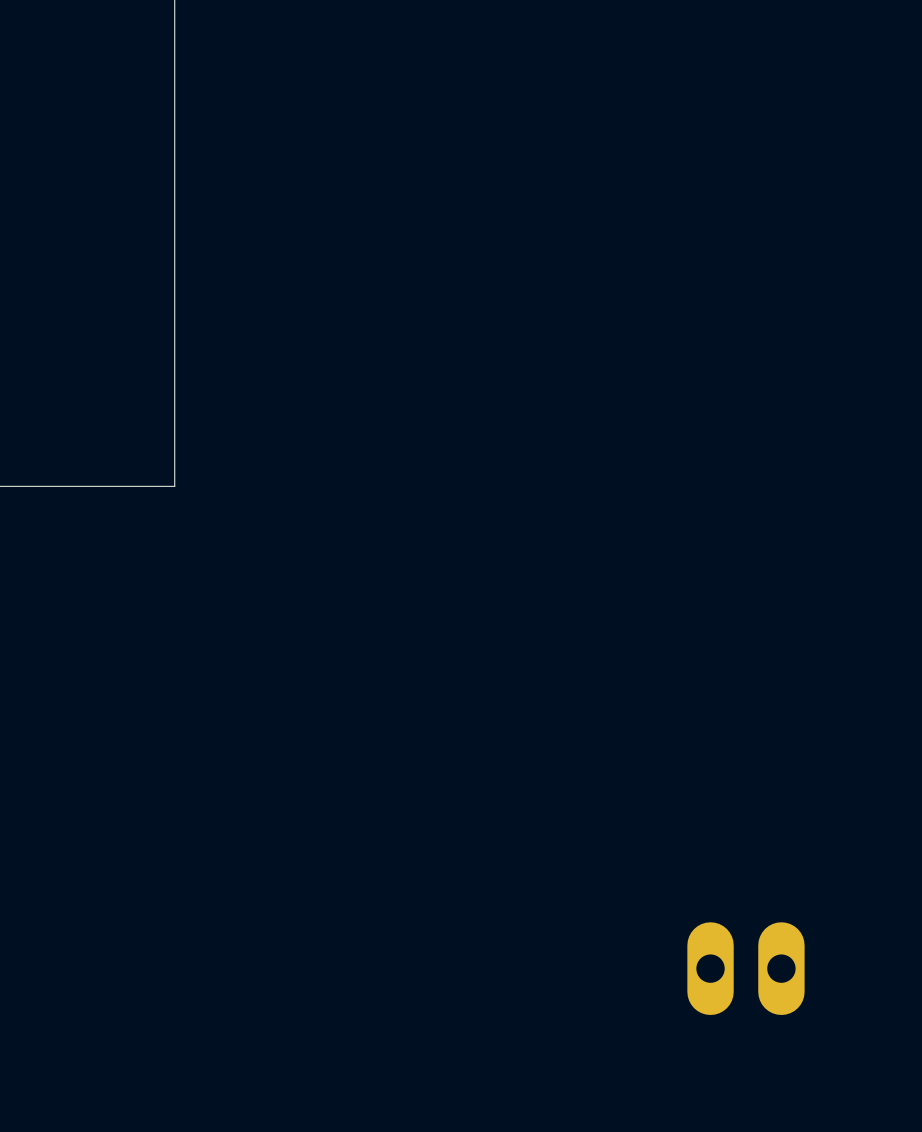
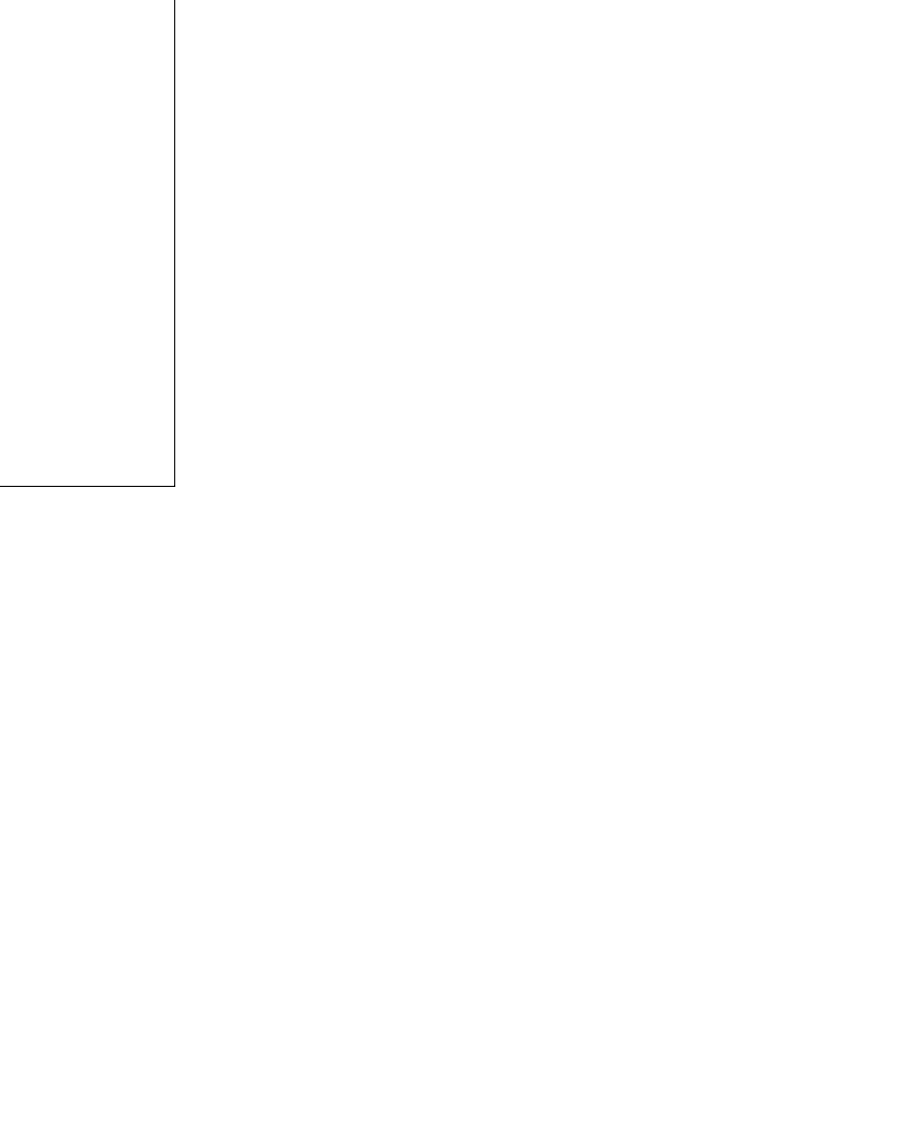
part: (745, 968) -> none

